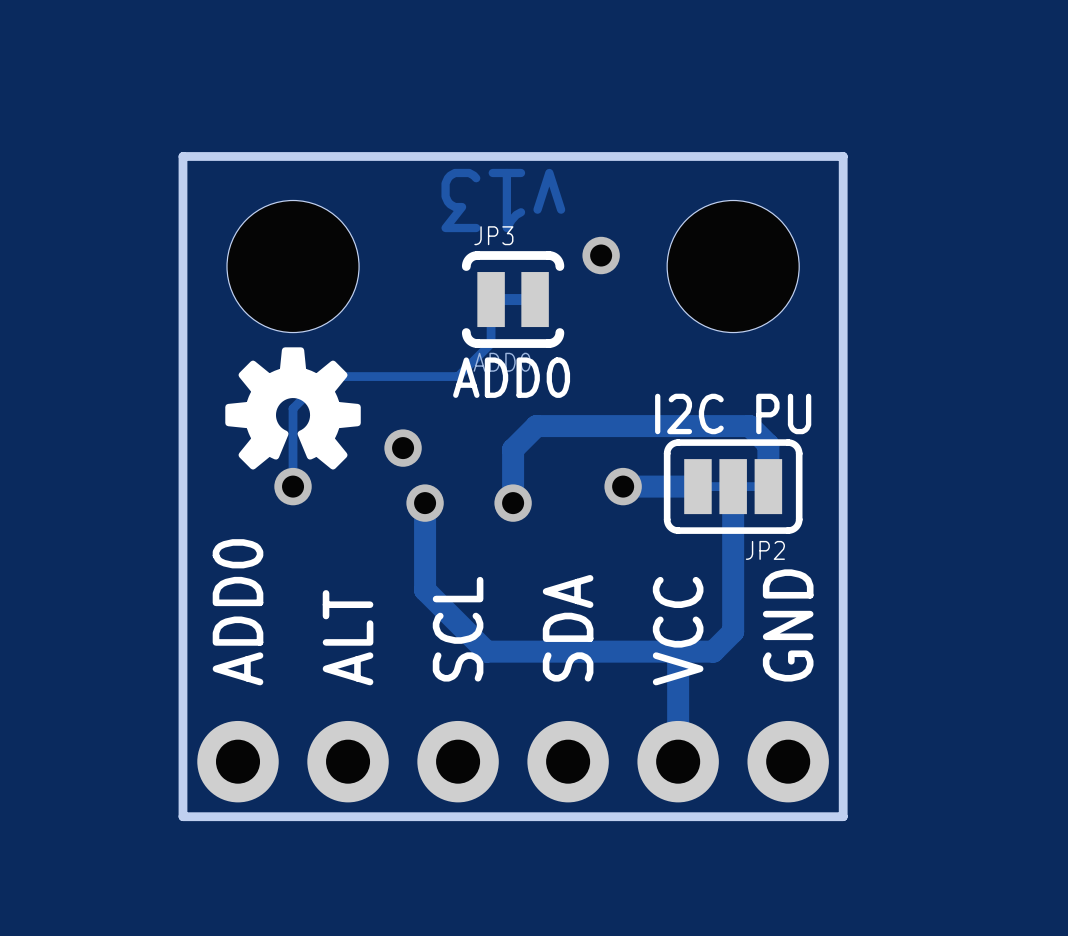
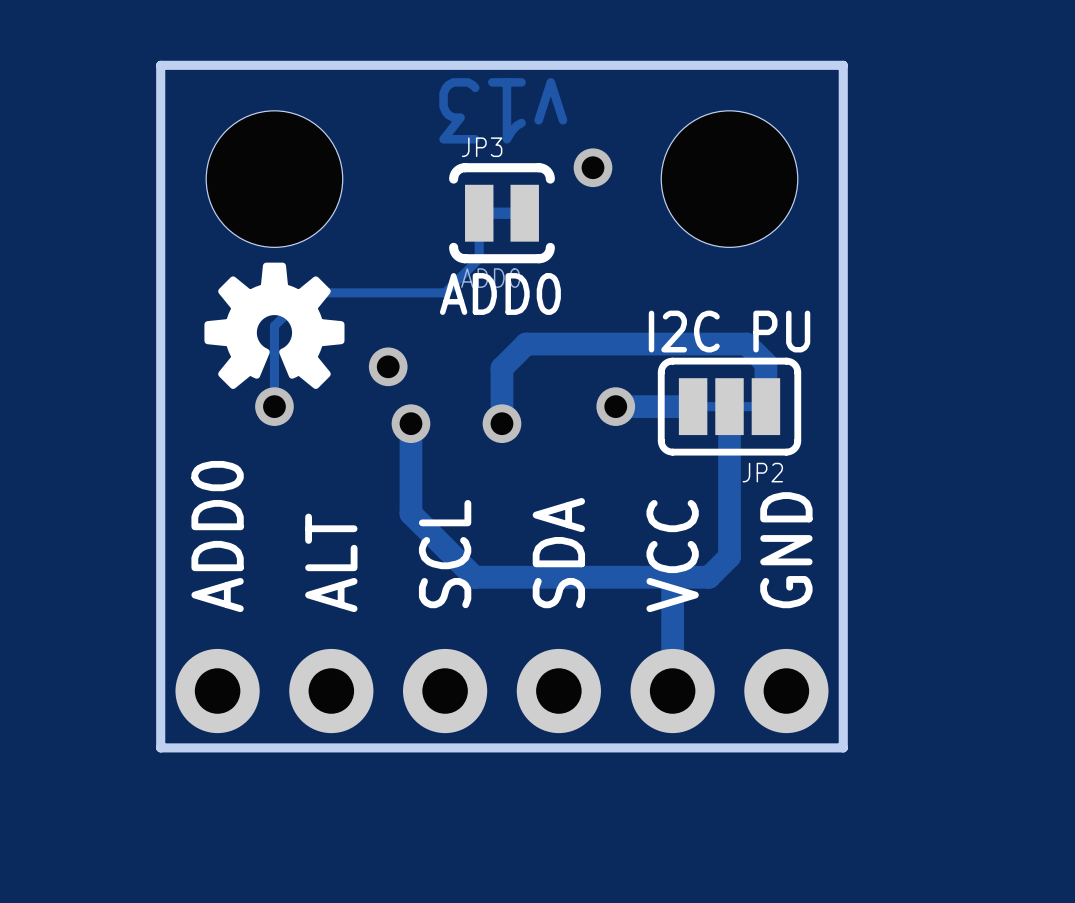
drawing: none -> [439, 78, 568, 144]
text: v13 (503, 200) -> none

